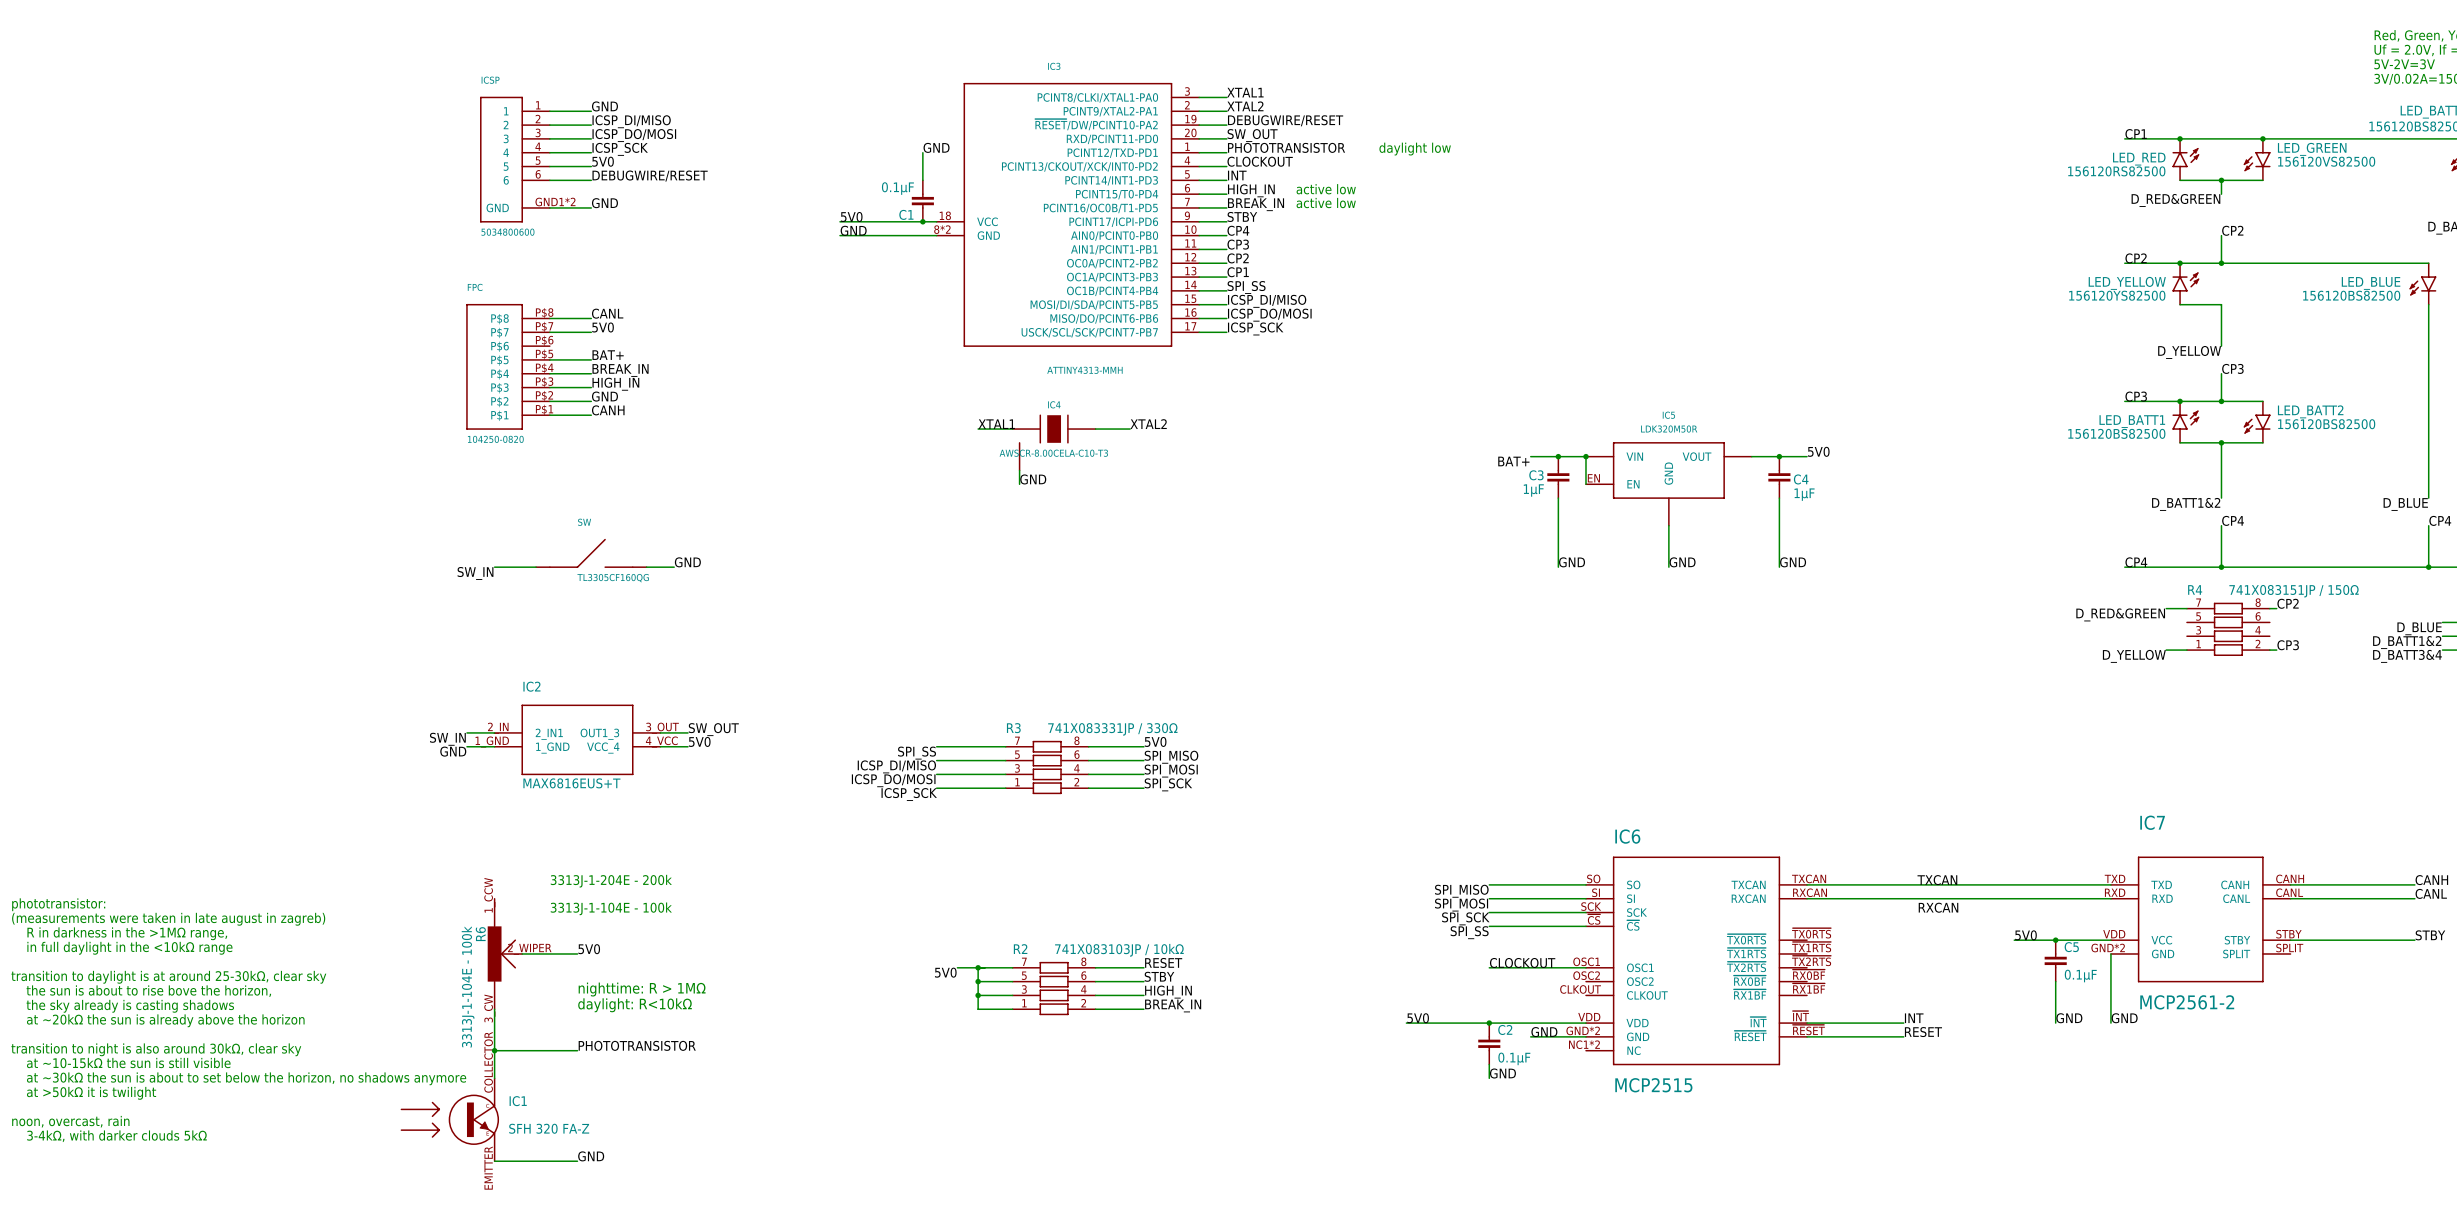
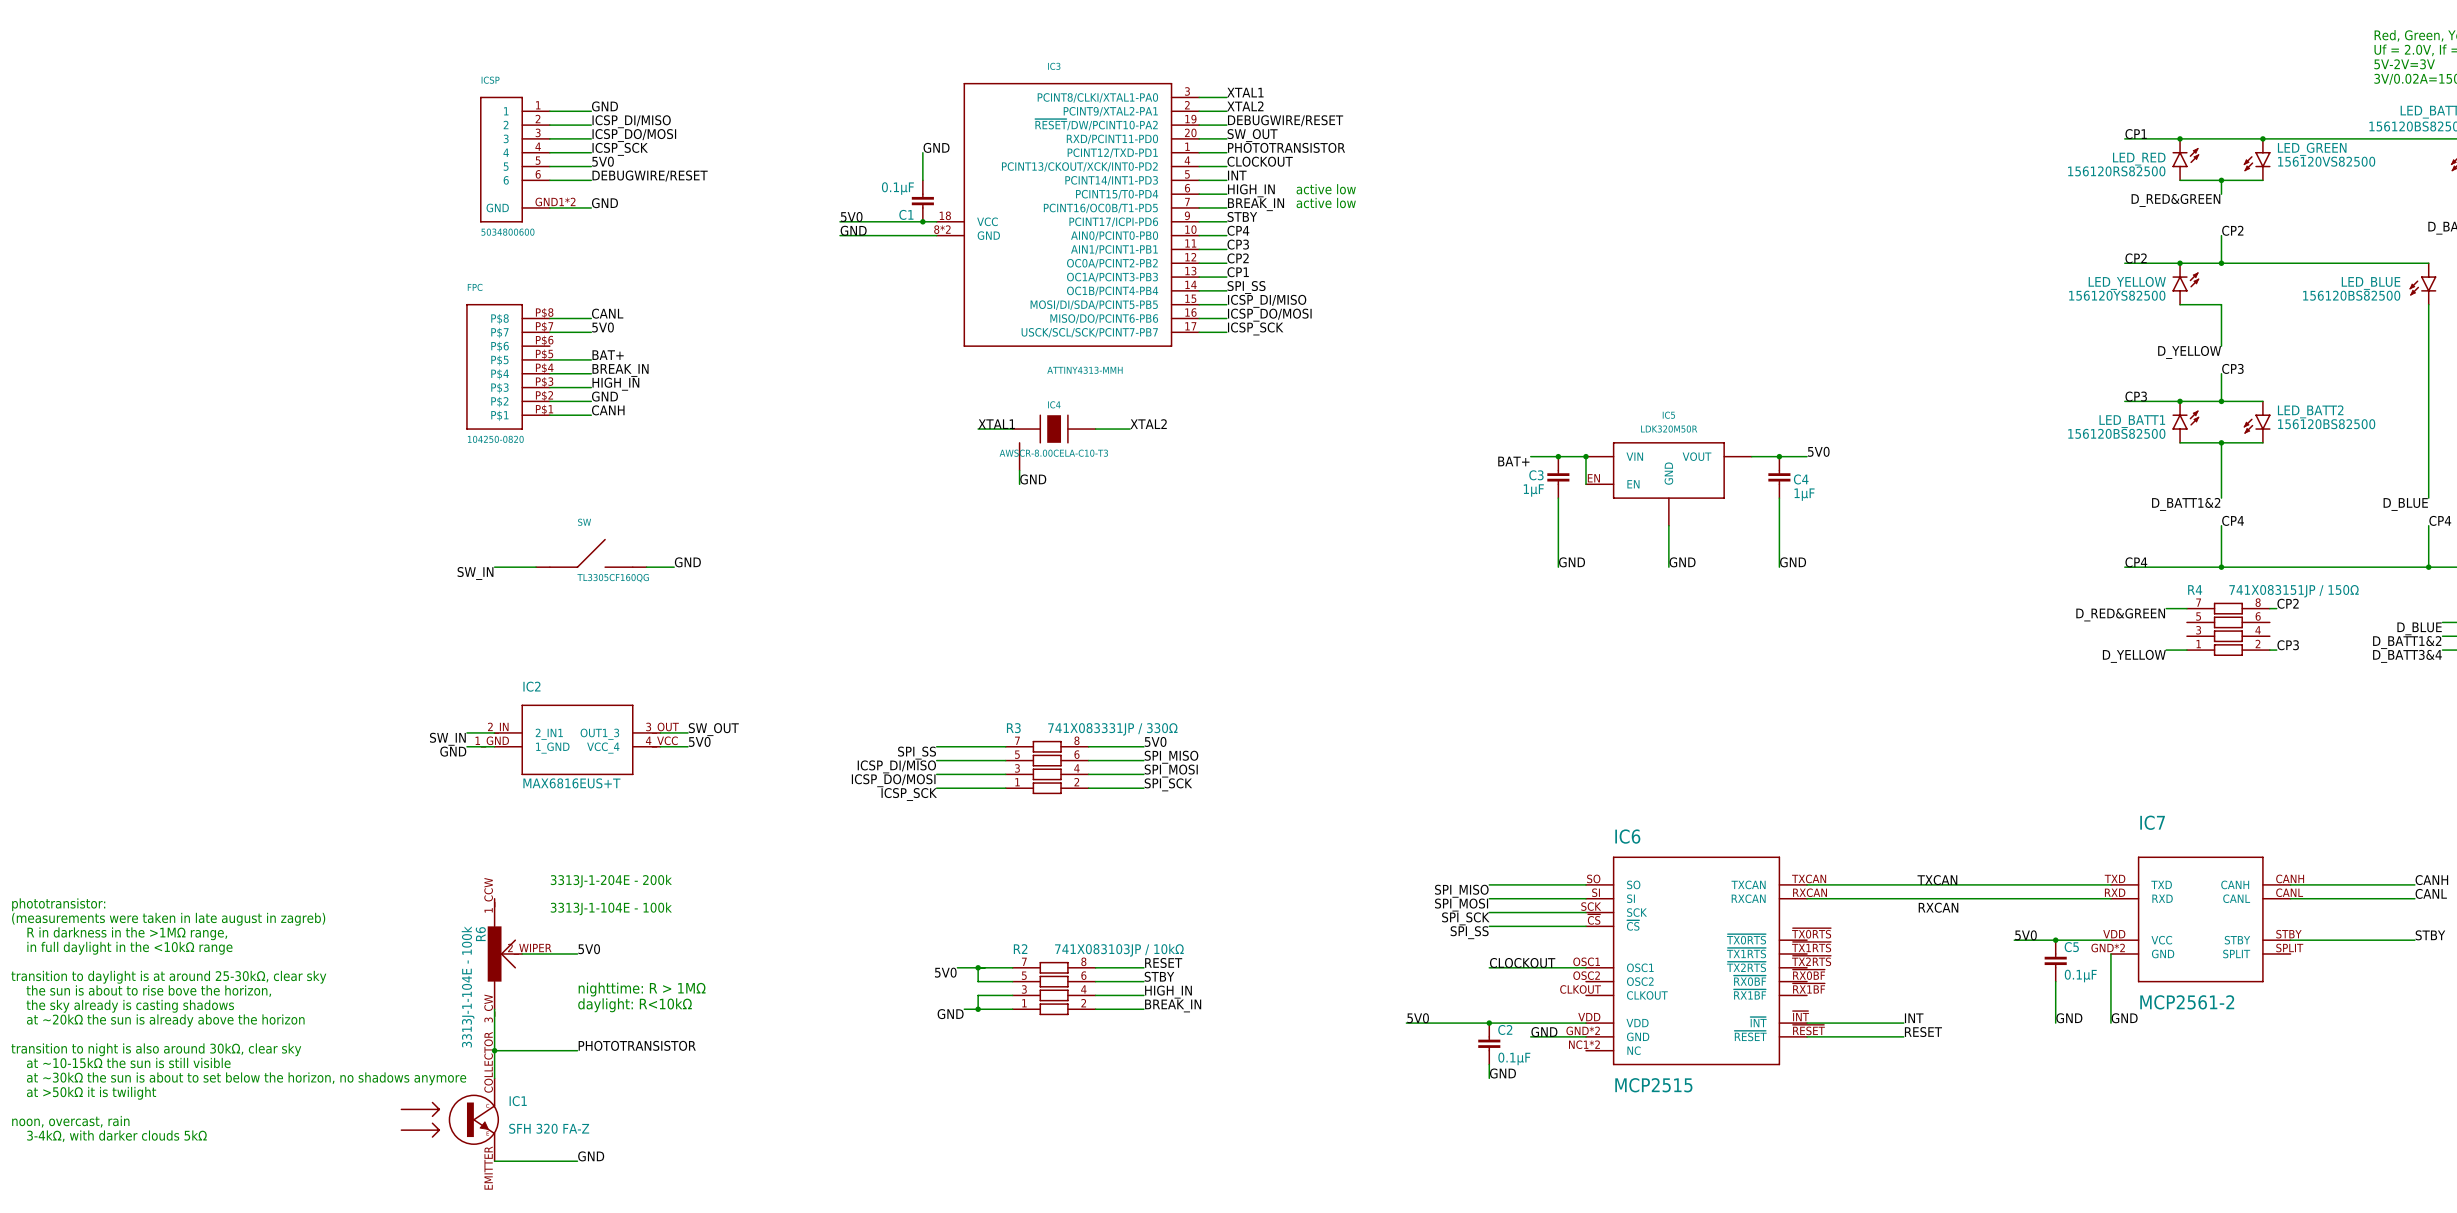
text: daylight low (1415, 149) -> none
wire: (978, 981) (978, 995) -> none
junction: (978, 981) -> none
junction: (978, 995) -> none
wire: none -> (964, 1009) (978, 1009)
junction: none -> (978, 1009)
label: none -> GND (950, 1014)

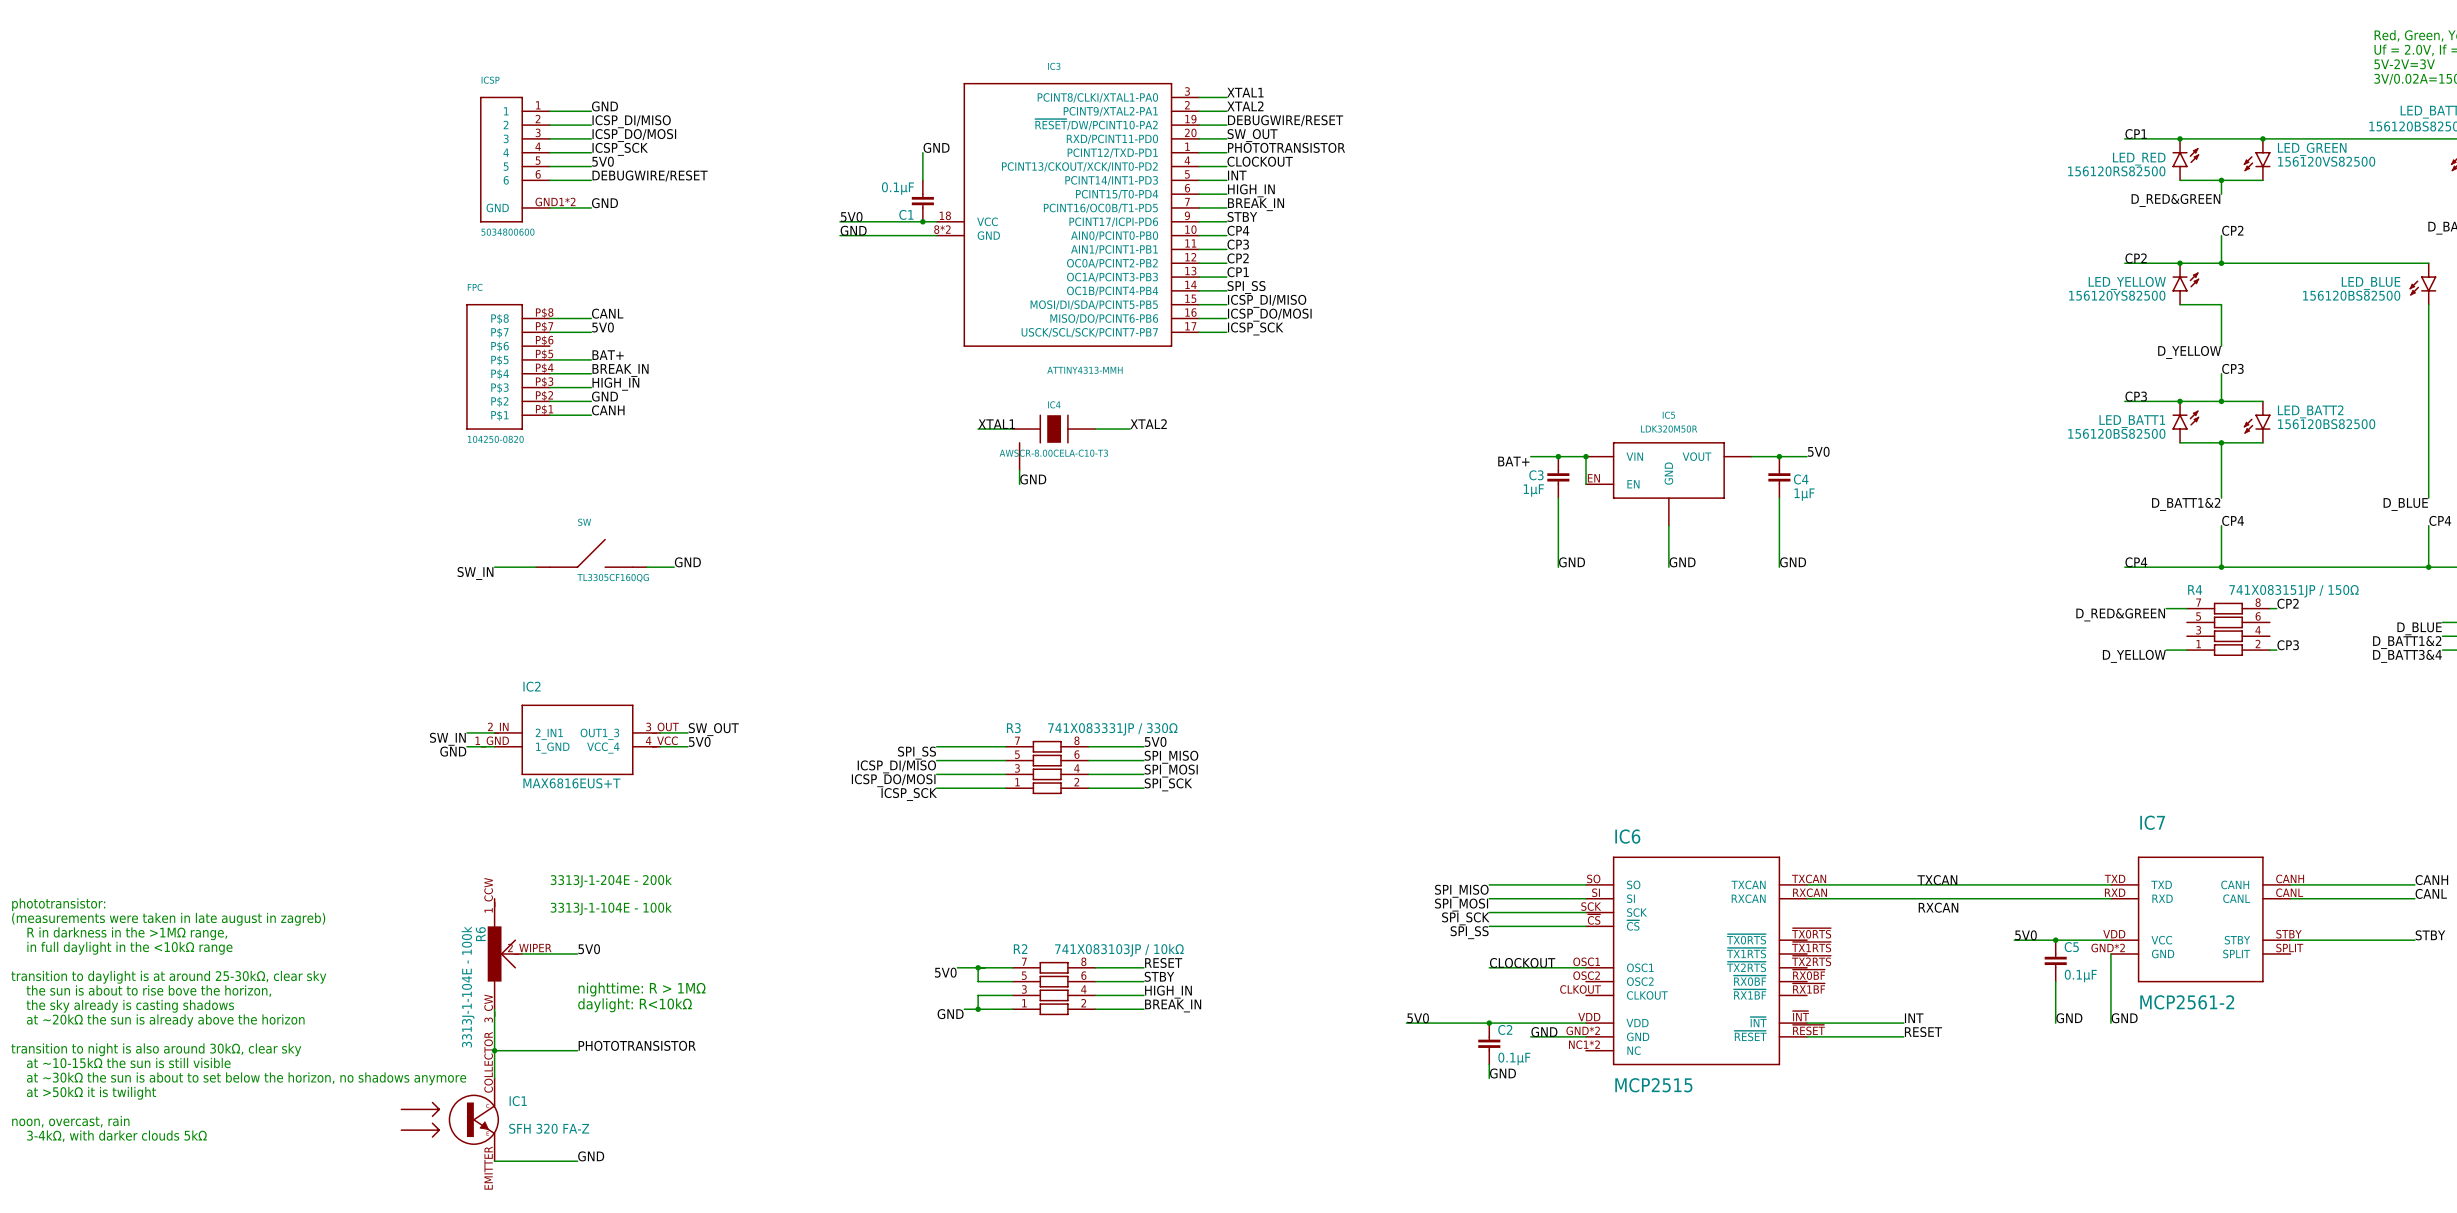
text: active low (1326, 189) -> none
text: active low (1326, 203) -> none

